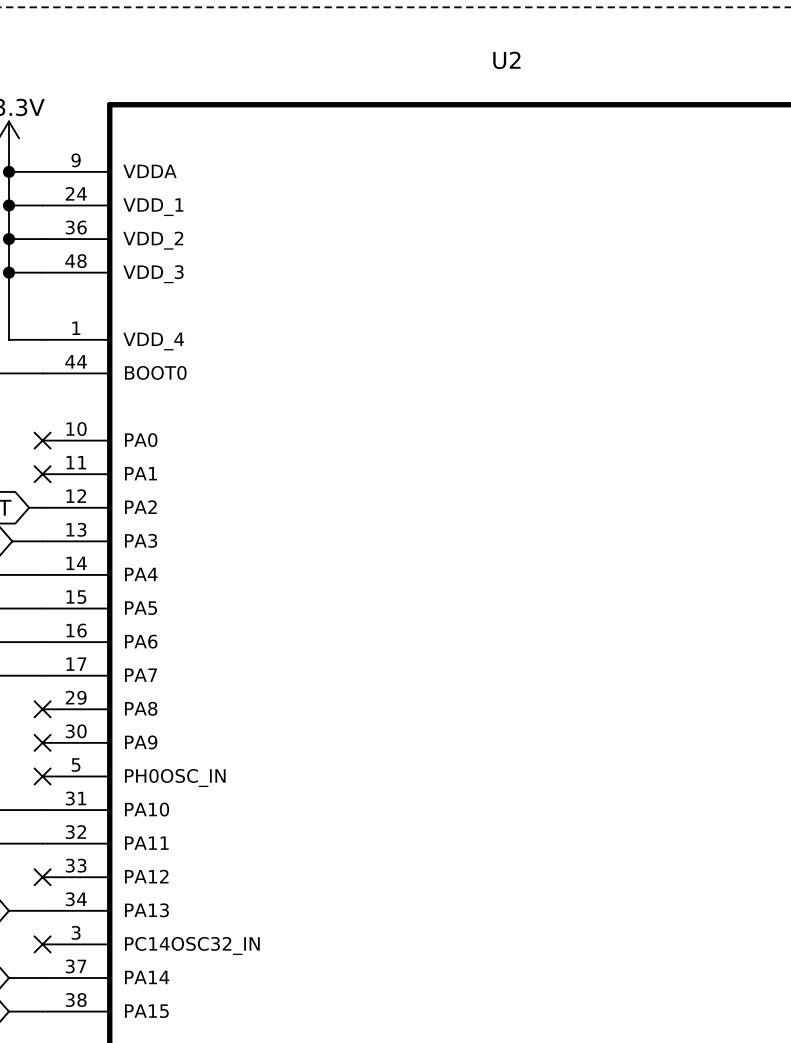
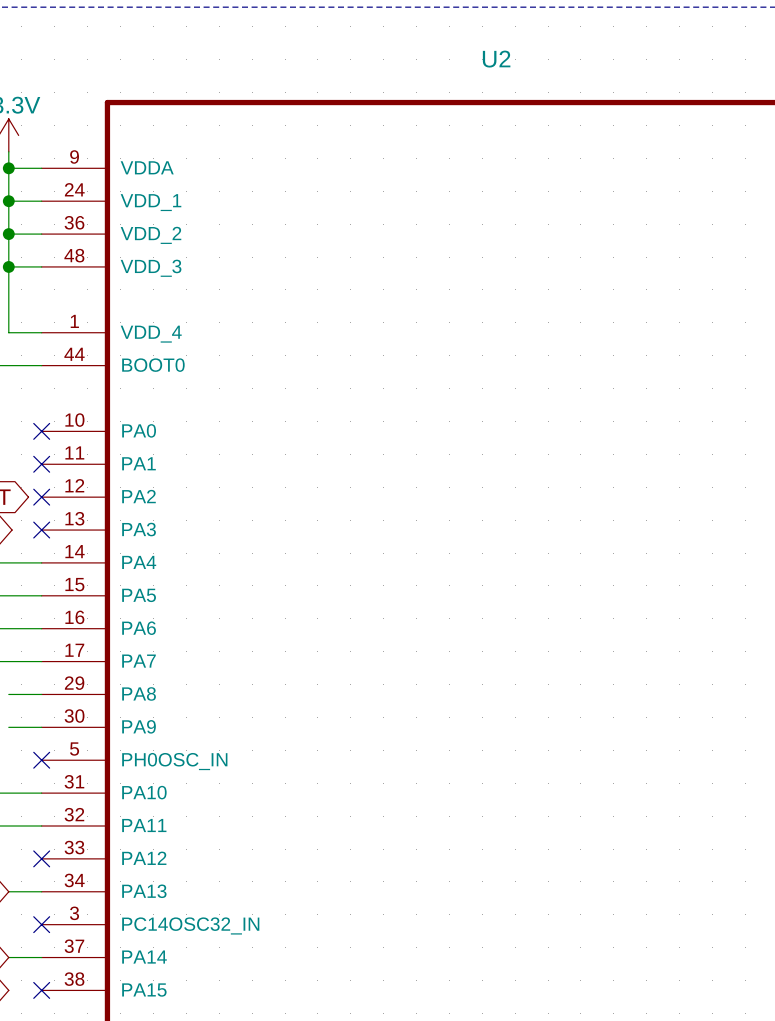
wire: (29, 507) (42, 507) -> none
no-connect mark: none -> (41, 497)
wire: (12, 541) (42, 541) -> none
no-connect mark: none -> (41, 530)
wire: none -> (8, 694) (41, 694)
no-connect mark: (42, 709) -> none
no-connect mark: (42, 742) -> none
wire: (8, 1011) (42, 1011) -> (8, 727) (41, 727)
no-connect mark: none -> (41, 990)

